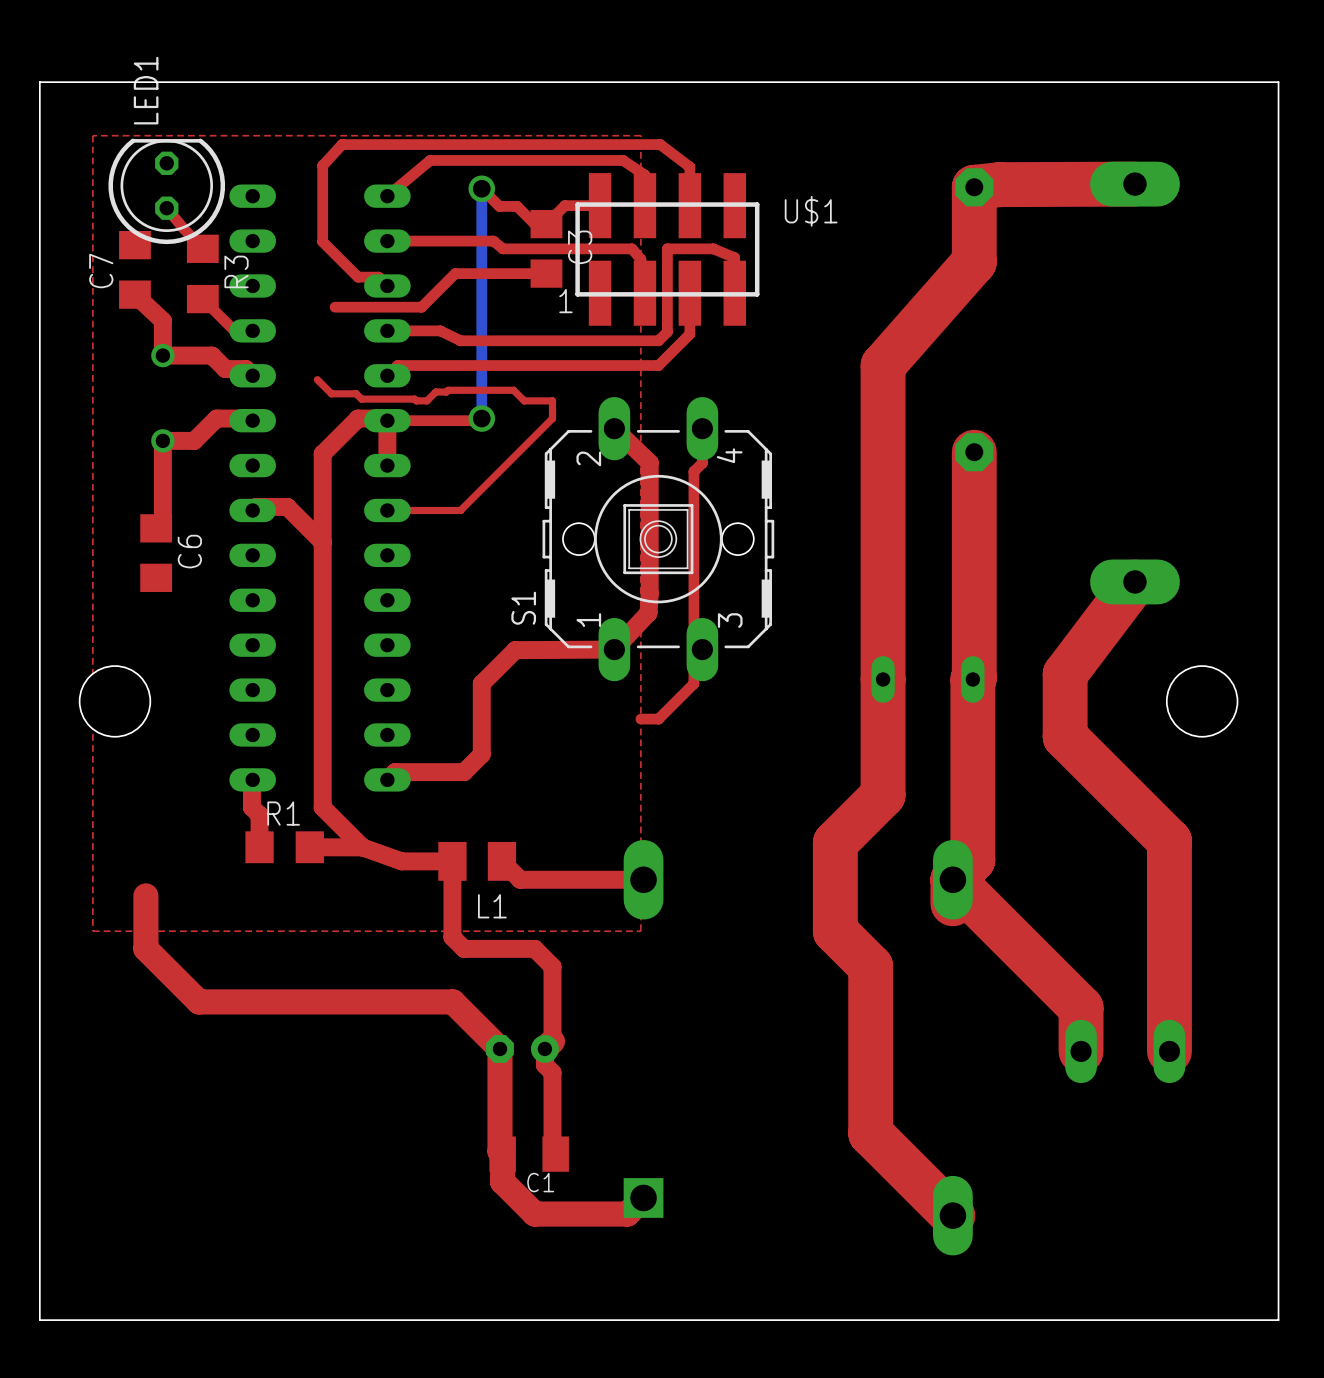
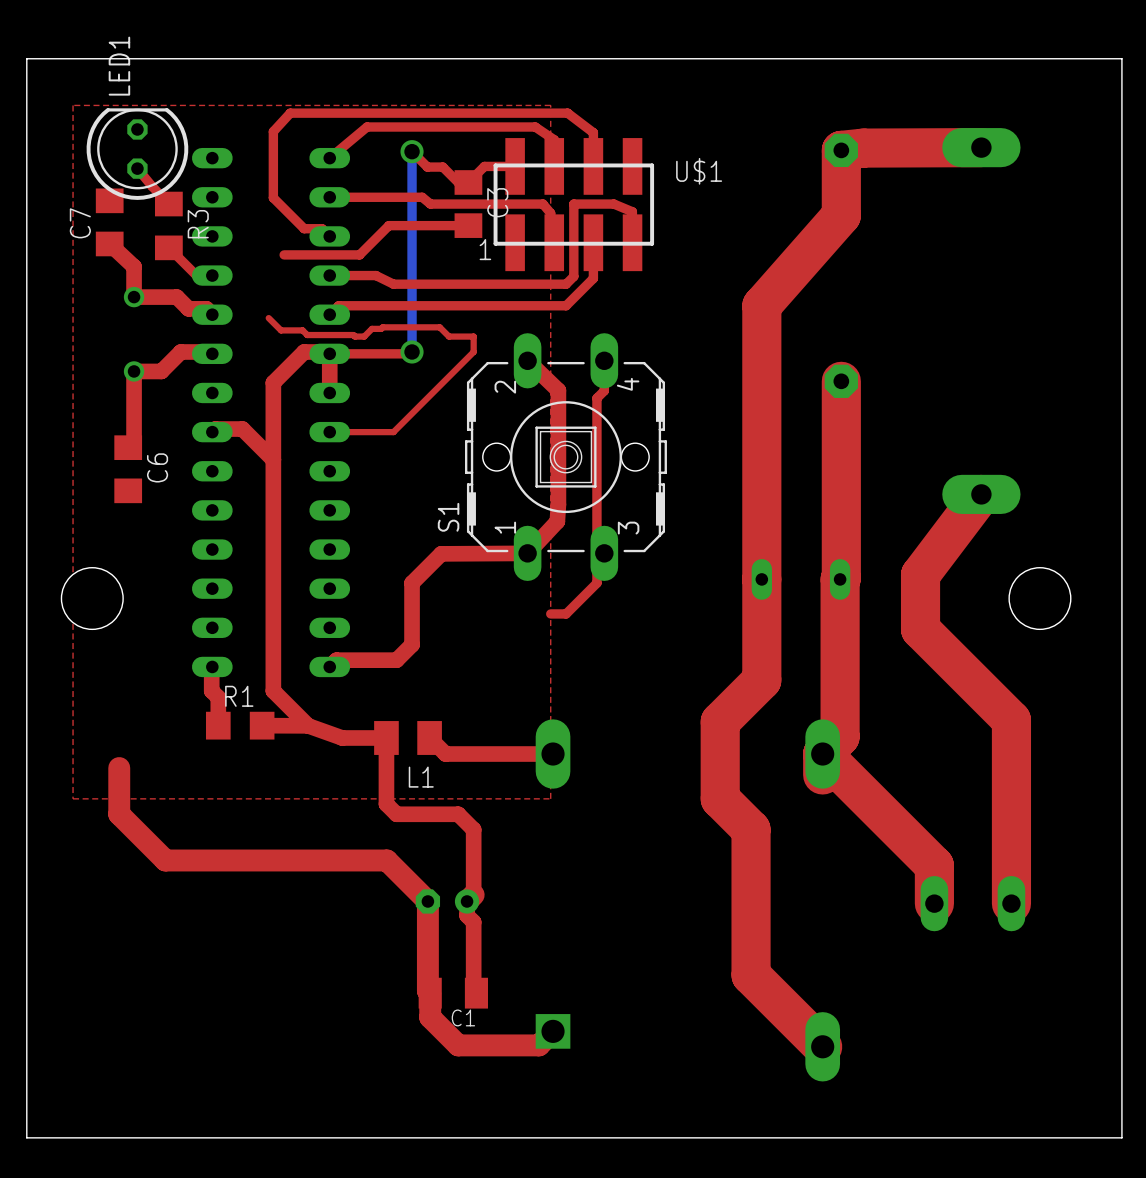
board edge: (1278, 82) (1278, 1320) -> (1106, 58) (1121, 58) (1121, 1137) (1106, 1137)

